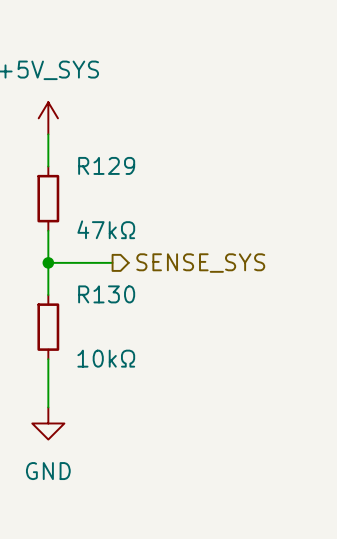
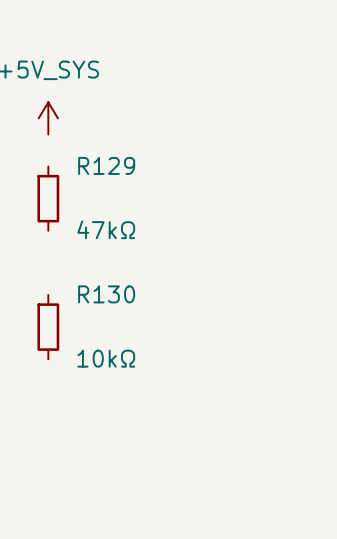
wire: (48, 134) (48, 166) -> none
wire: (48, 230) (48, 295) -> none
wire: (48, 262) (112, 262) -> none
junction: (48, 262) -> none
hierarchical label: SENSE_SYS (200, 263) -> none
wire: (48, 359) (48, 407) -> none
power symbol: GND (48, 423) -> none

